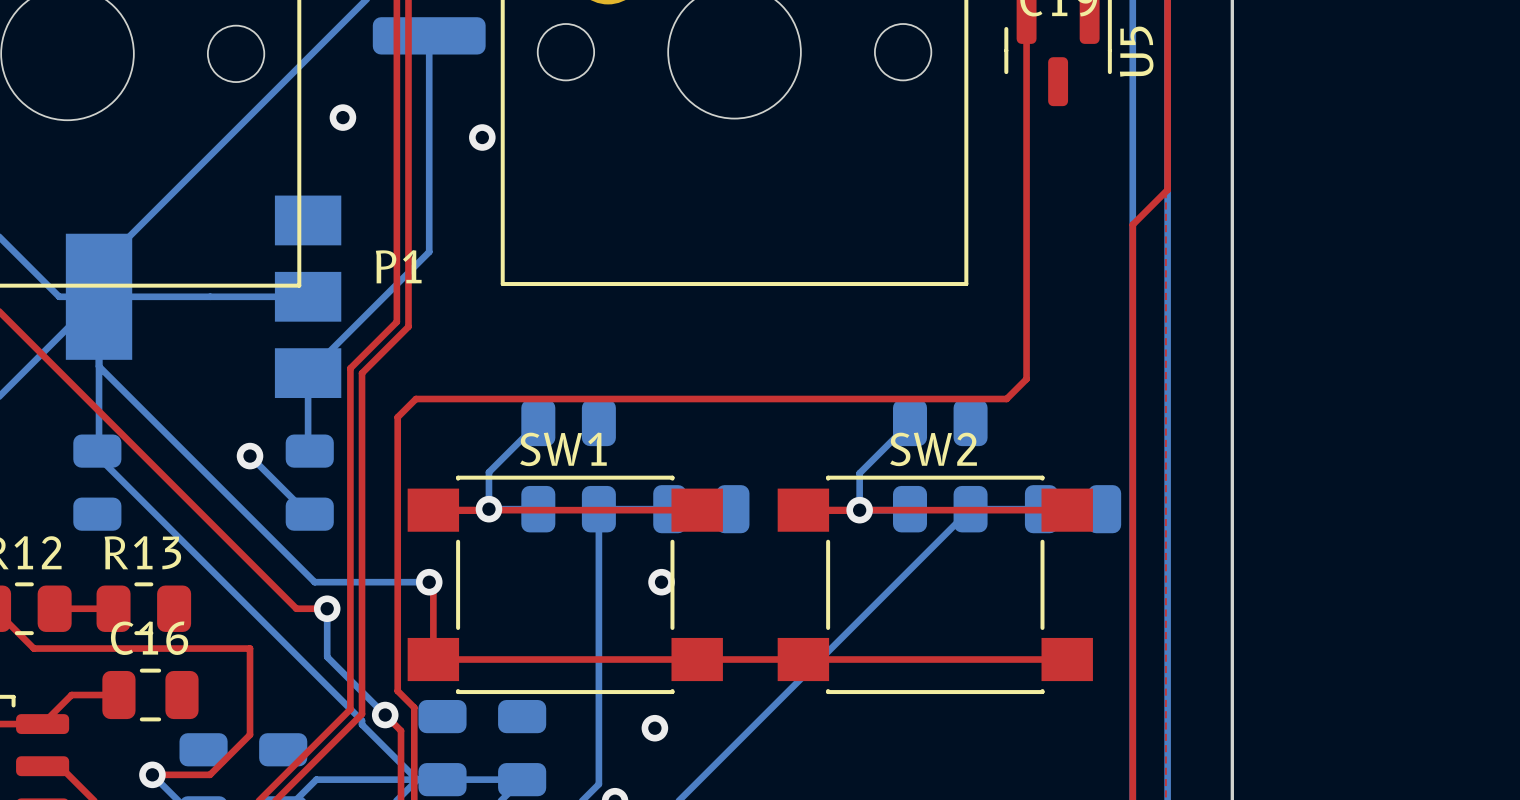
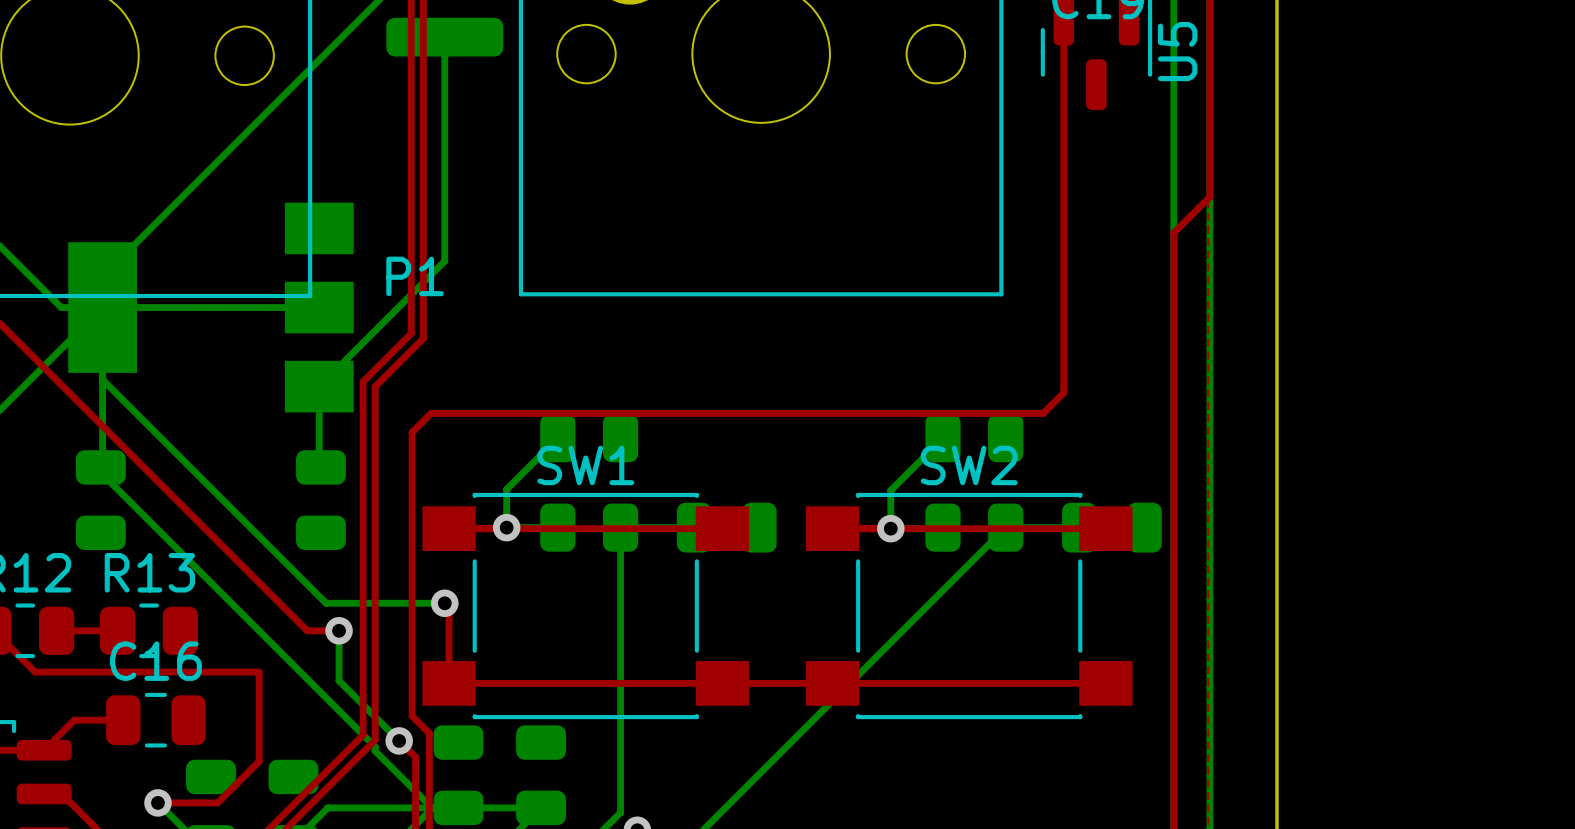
via: (342, 117) -> none
via: (482, 137) -> none
bottom track: (250, 456) (309, 514) -> none
via: (250, 456) -> none
via: (661, 582) -> none
via: (654, 728) -> none

